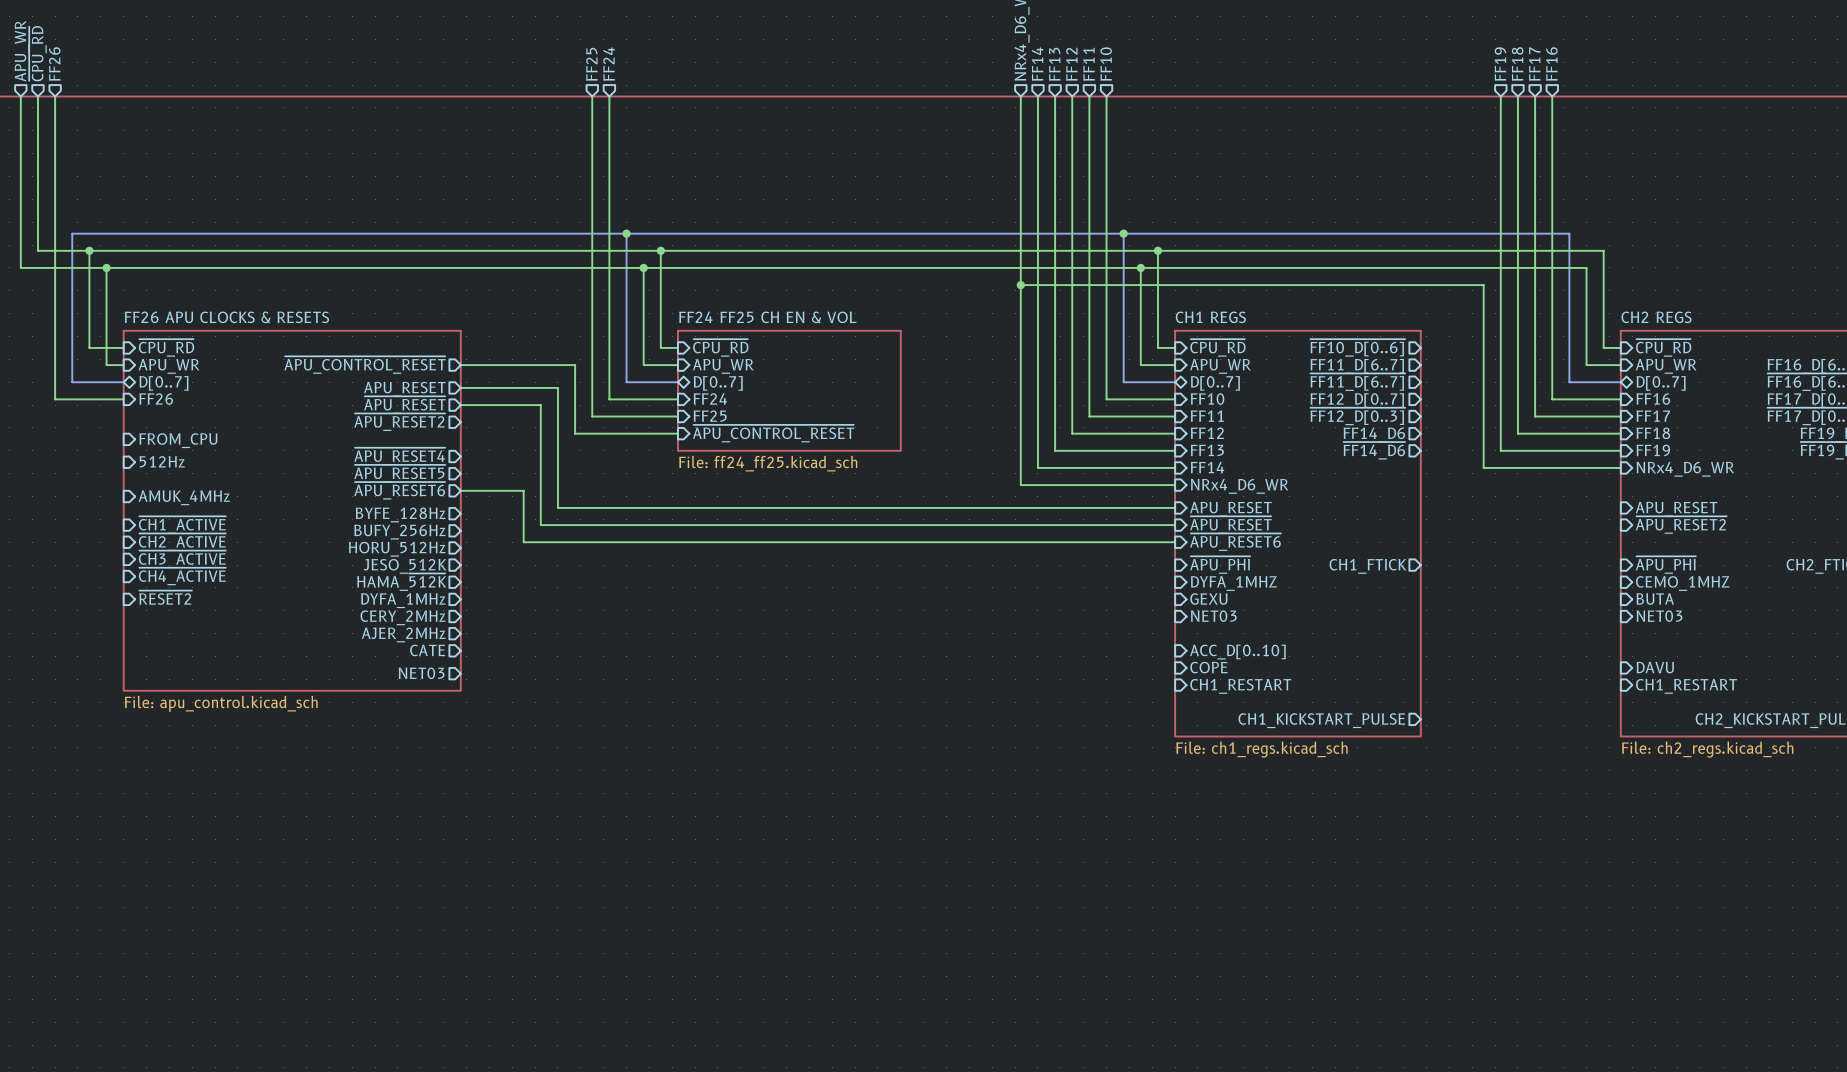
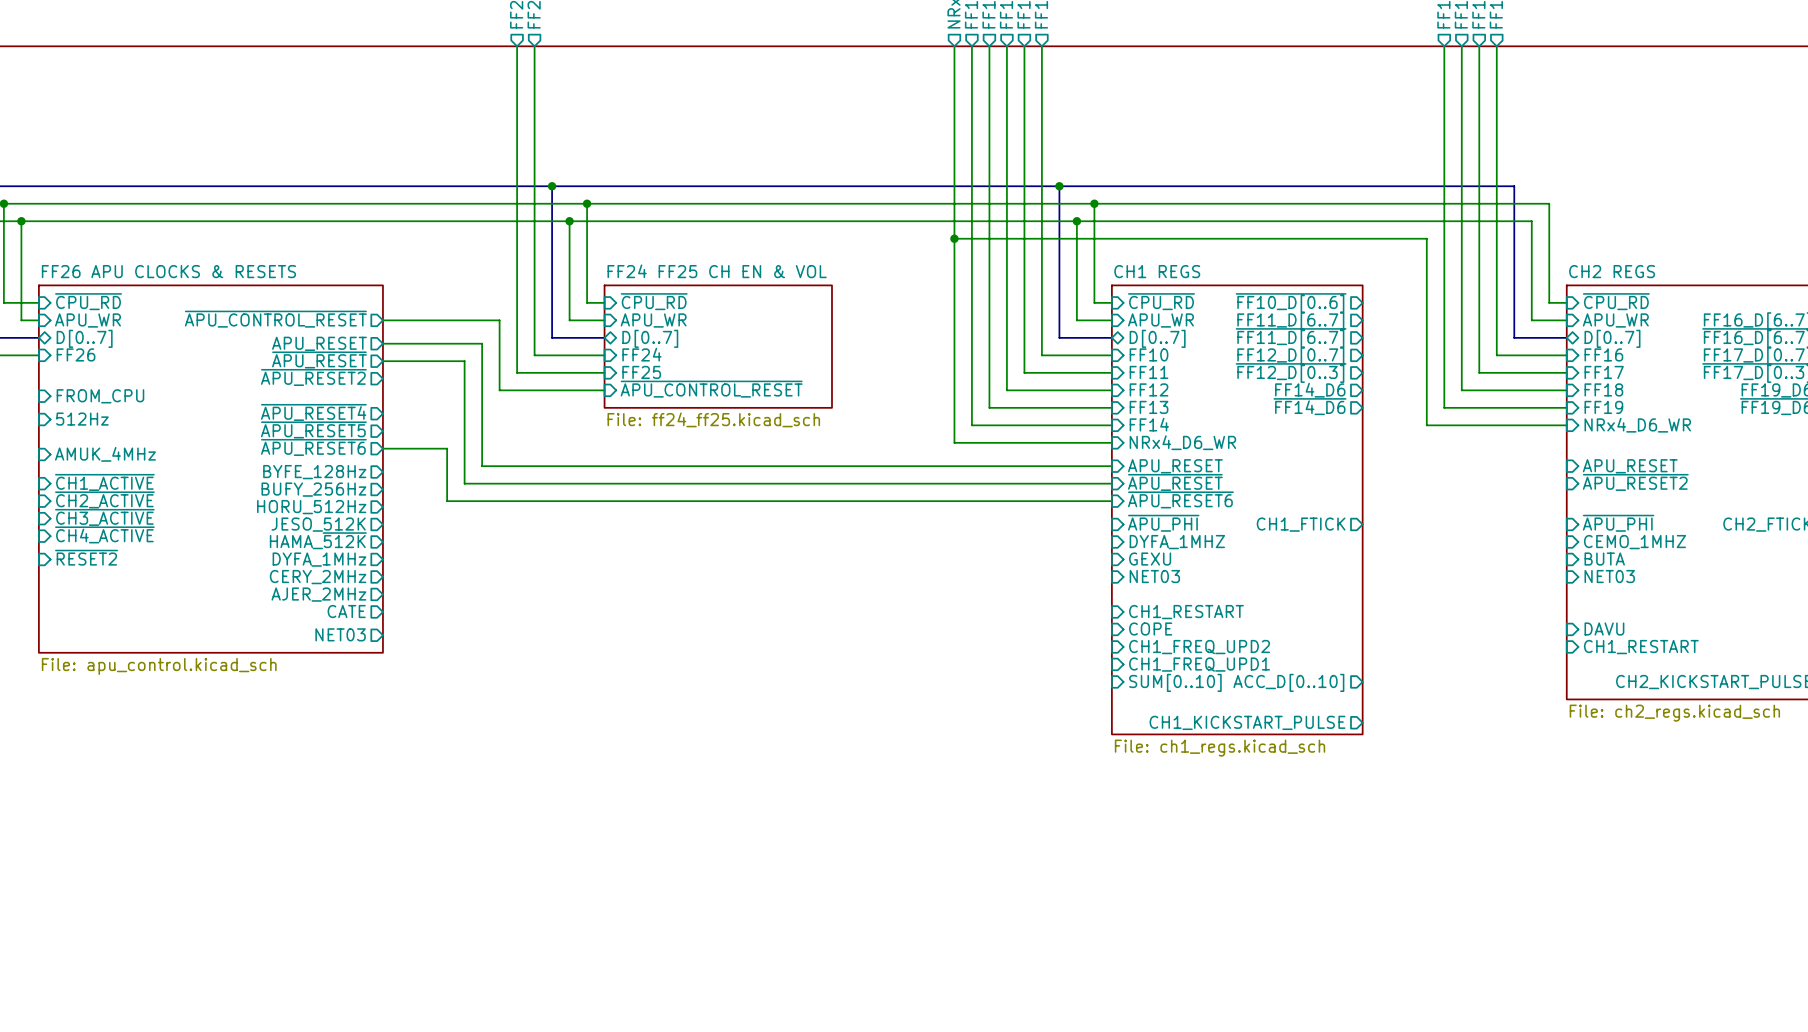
sheet CH1 REGS shape: [1174, 330, 1422, 738] -> [1111, 284, 1364, 736]
sheet pin: ACC_D[0..10] (1237, 652) -> CH1_RESTART (1186, 612)
sheet pin: CH1_RESTART (1240, 686) -> CH1_FREQ_UPD2 (1199, 647)
sheet pin: none -> CH1_FREQ_UPD1 (1199, 664)
sheet pin: none -> SUM[0..10] (1175, 682)
sheet pin: CH1_KICKSTART_PULSE (1321, 720) -> ACC_D[0..10] (1288, 682)
sheet pin: none -> CH1_KICKSTART_PULSE (1247, 722)

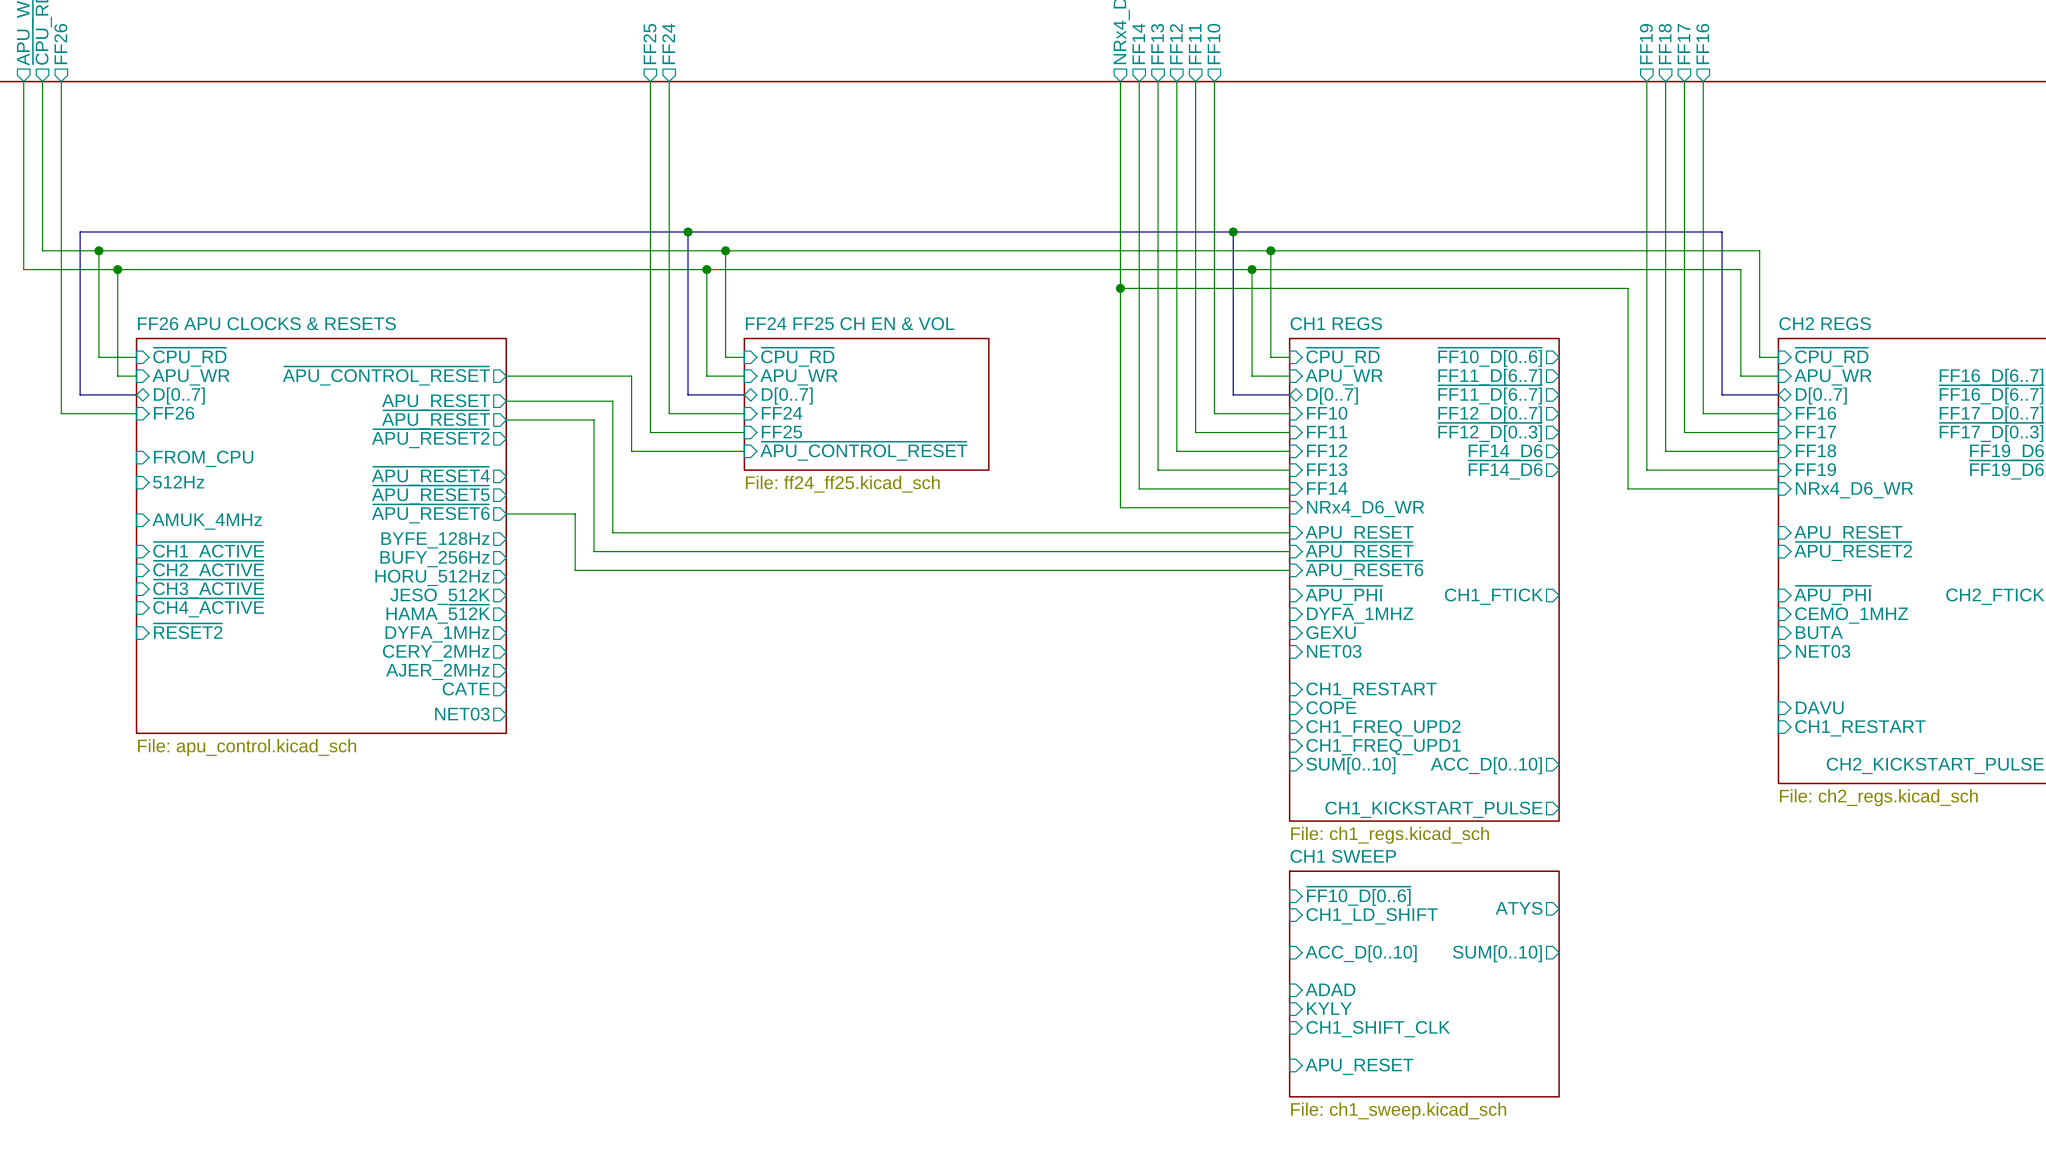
sheet pin: none -> ~{FF10_D[0..6]} (1358, 896)
sheet pin: none -> ATYS (1519, 908)
sheet pin: none -> CH1_LD_SHIFT (1372, 916)
sheet pin: none -> ACC_D[0..10] (1361, 953)
sheet pin: none -> SUM[0..10] (1497, 953)
sheet CH1 SWEEP: none -> File: ch1_sweep.kicad_sch (1424, 984)
sheet pin: none -> ADAD (1330, 989)
sheet pin: none -> KYLY (1329, 1008)
sheet pin: none -> CH1_SHIFT_CLK (1378, 1029)
sheet pin: none -> APU_RESET (1359, 1066)

